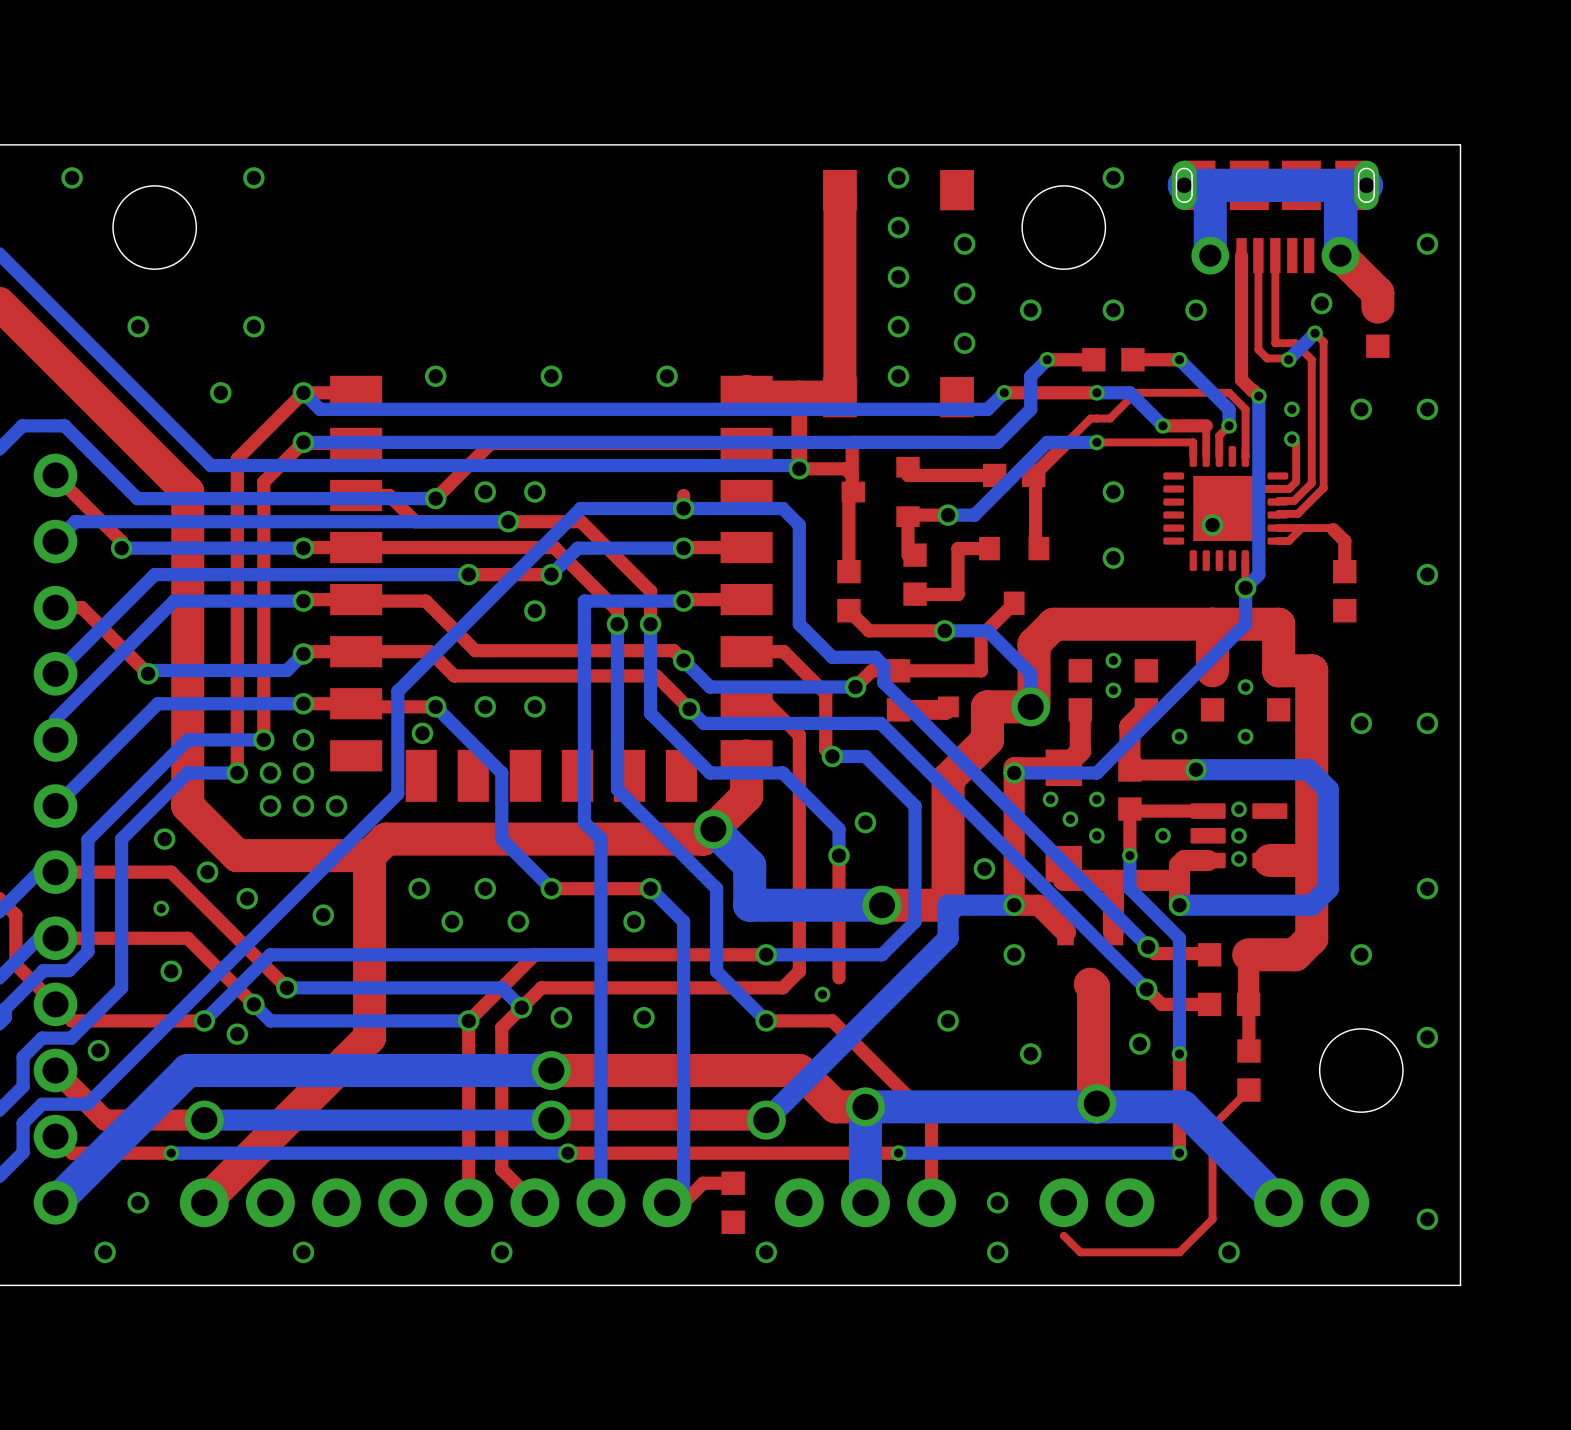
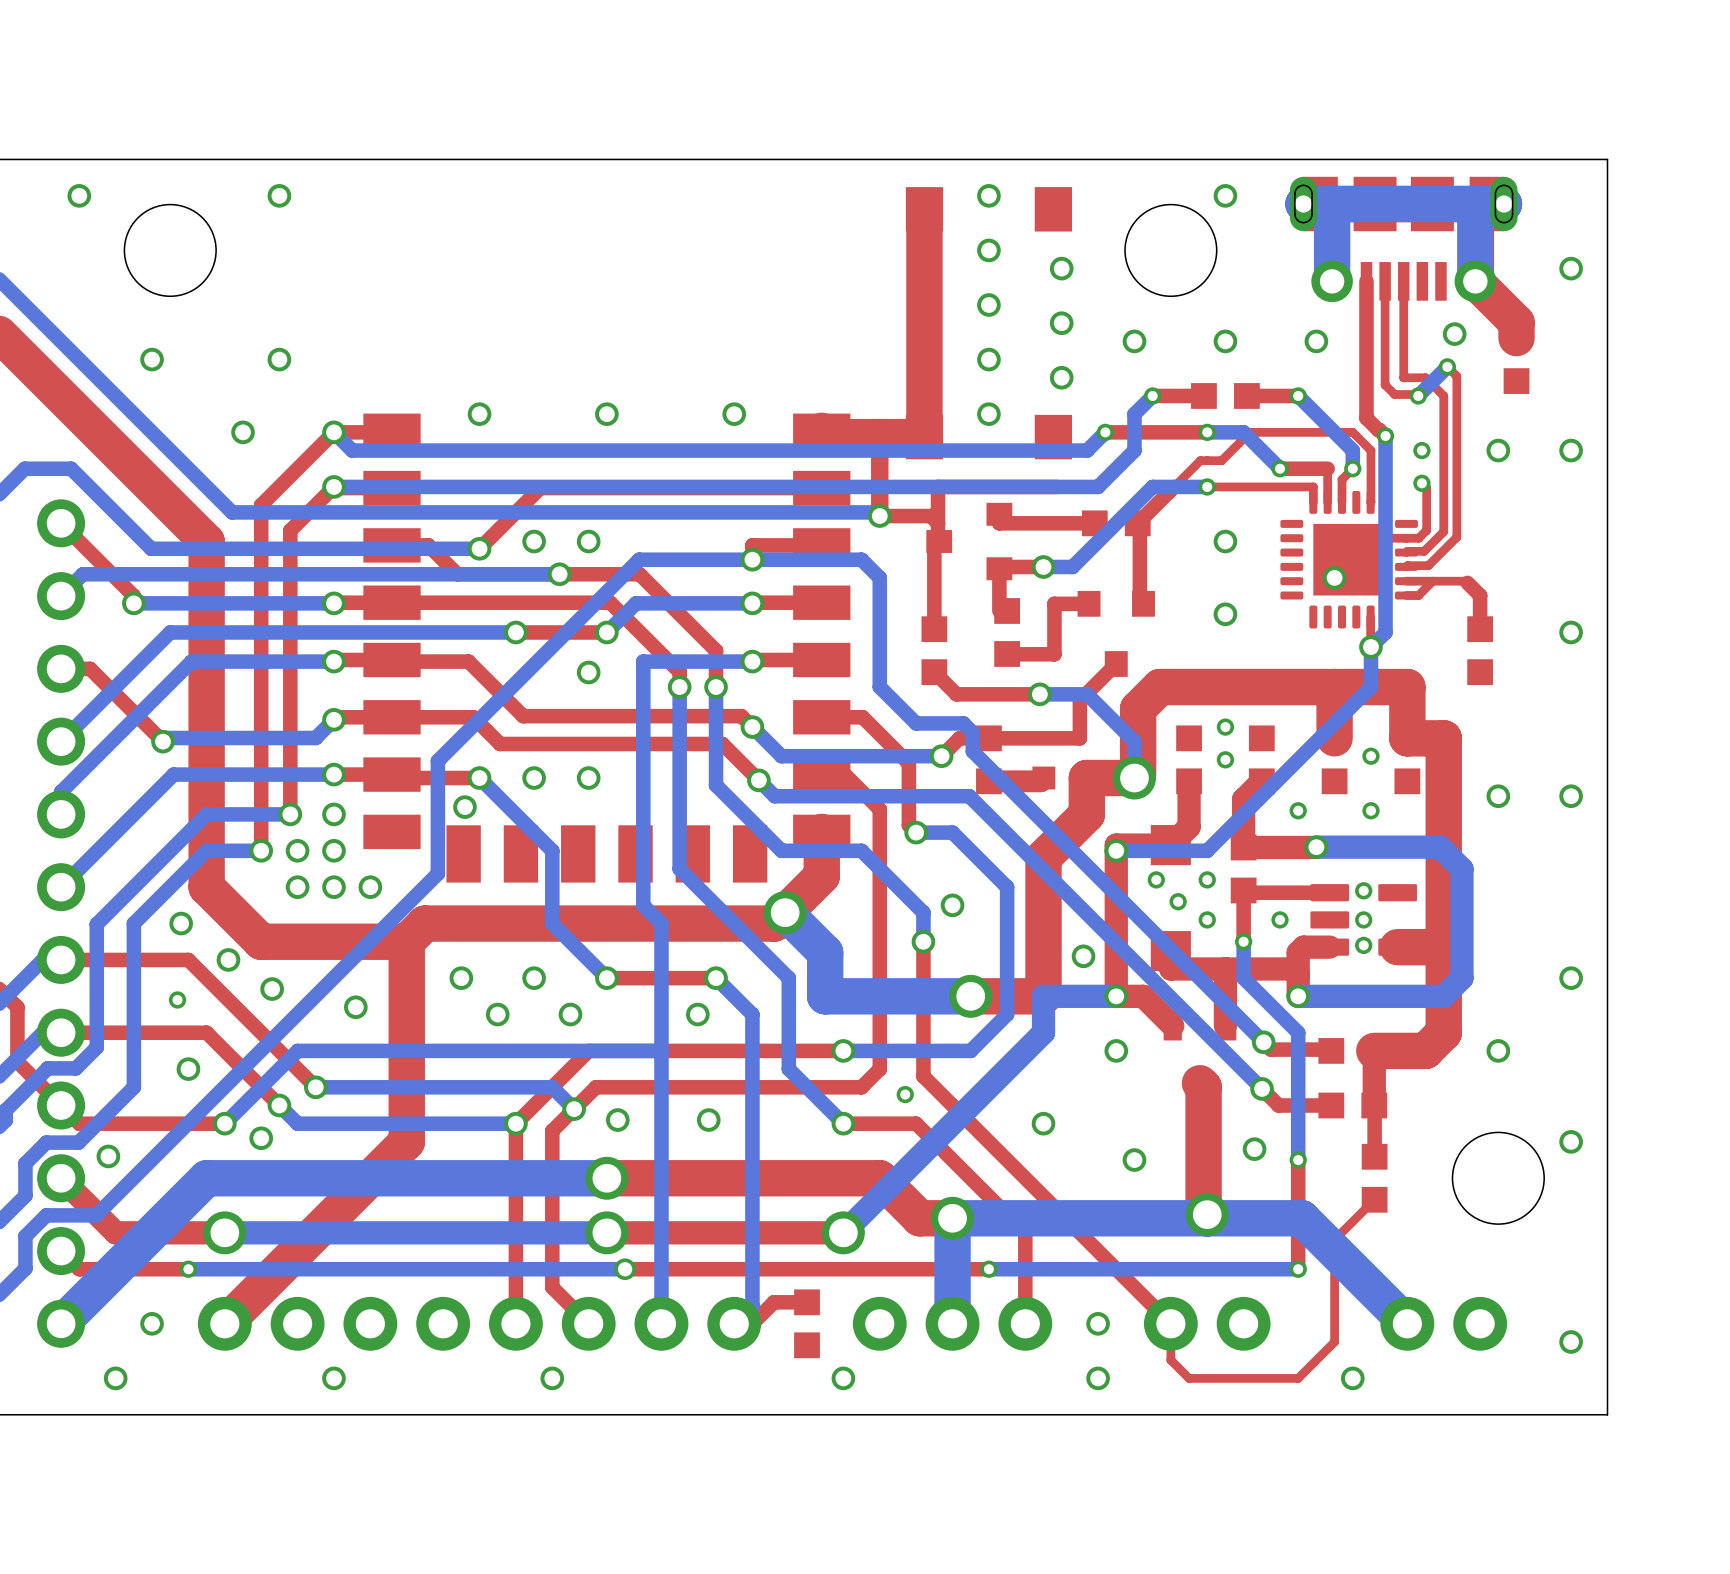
top track: none -> (821, 545) (752, 545)
top track: none -> (923, 1076) (1170, 1323) (1170, 1360)

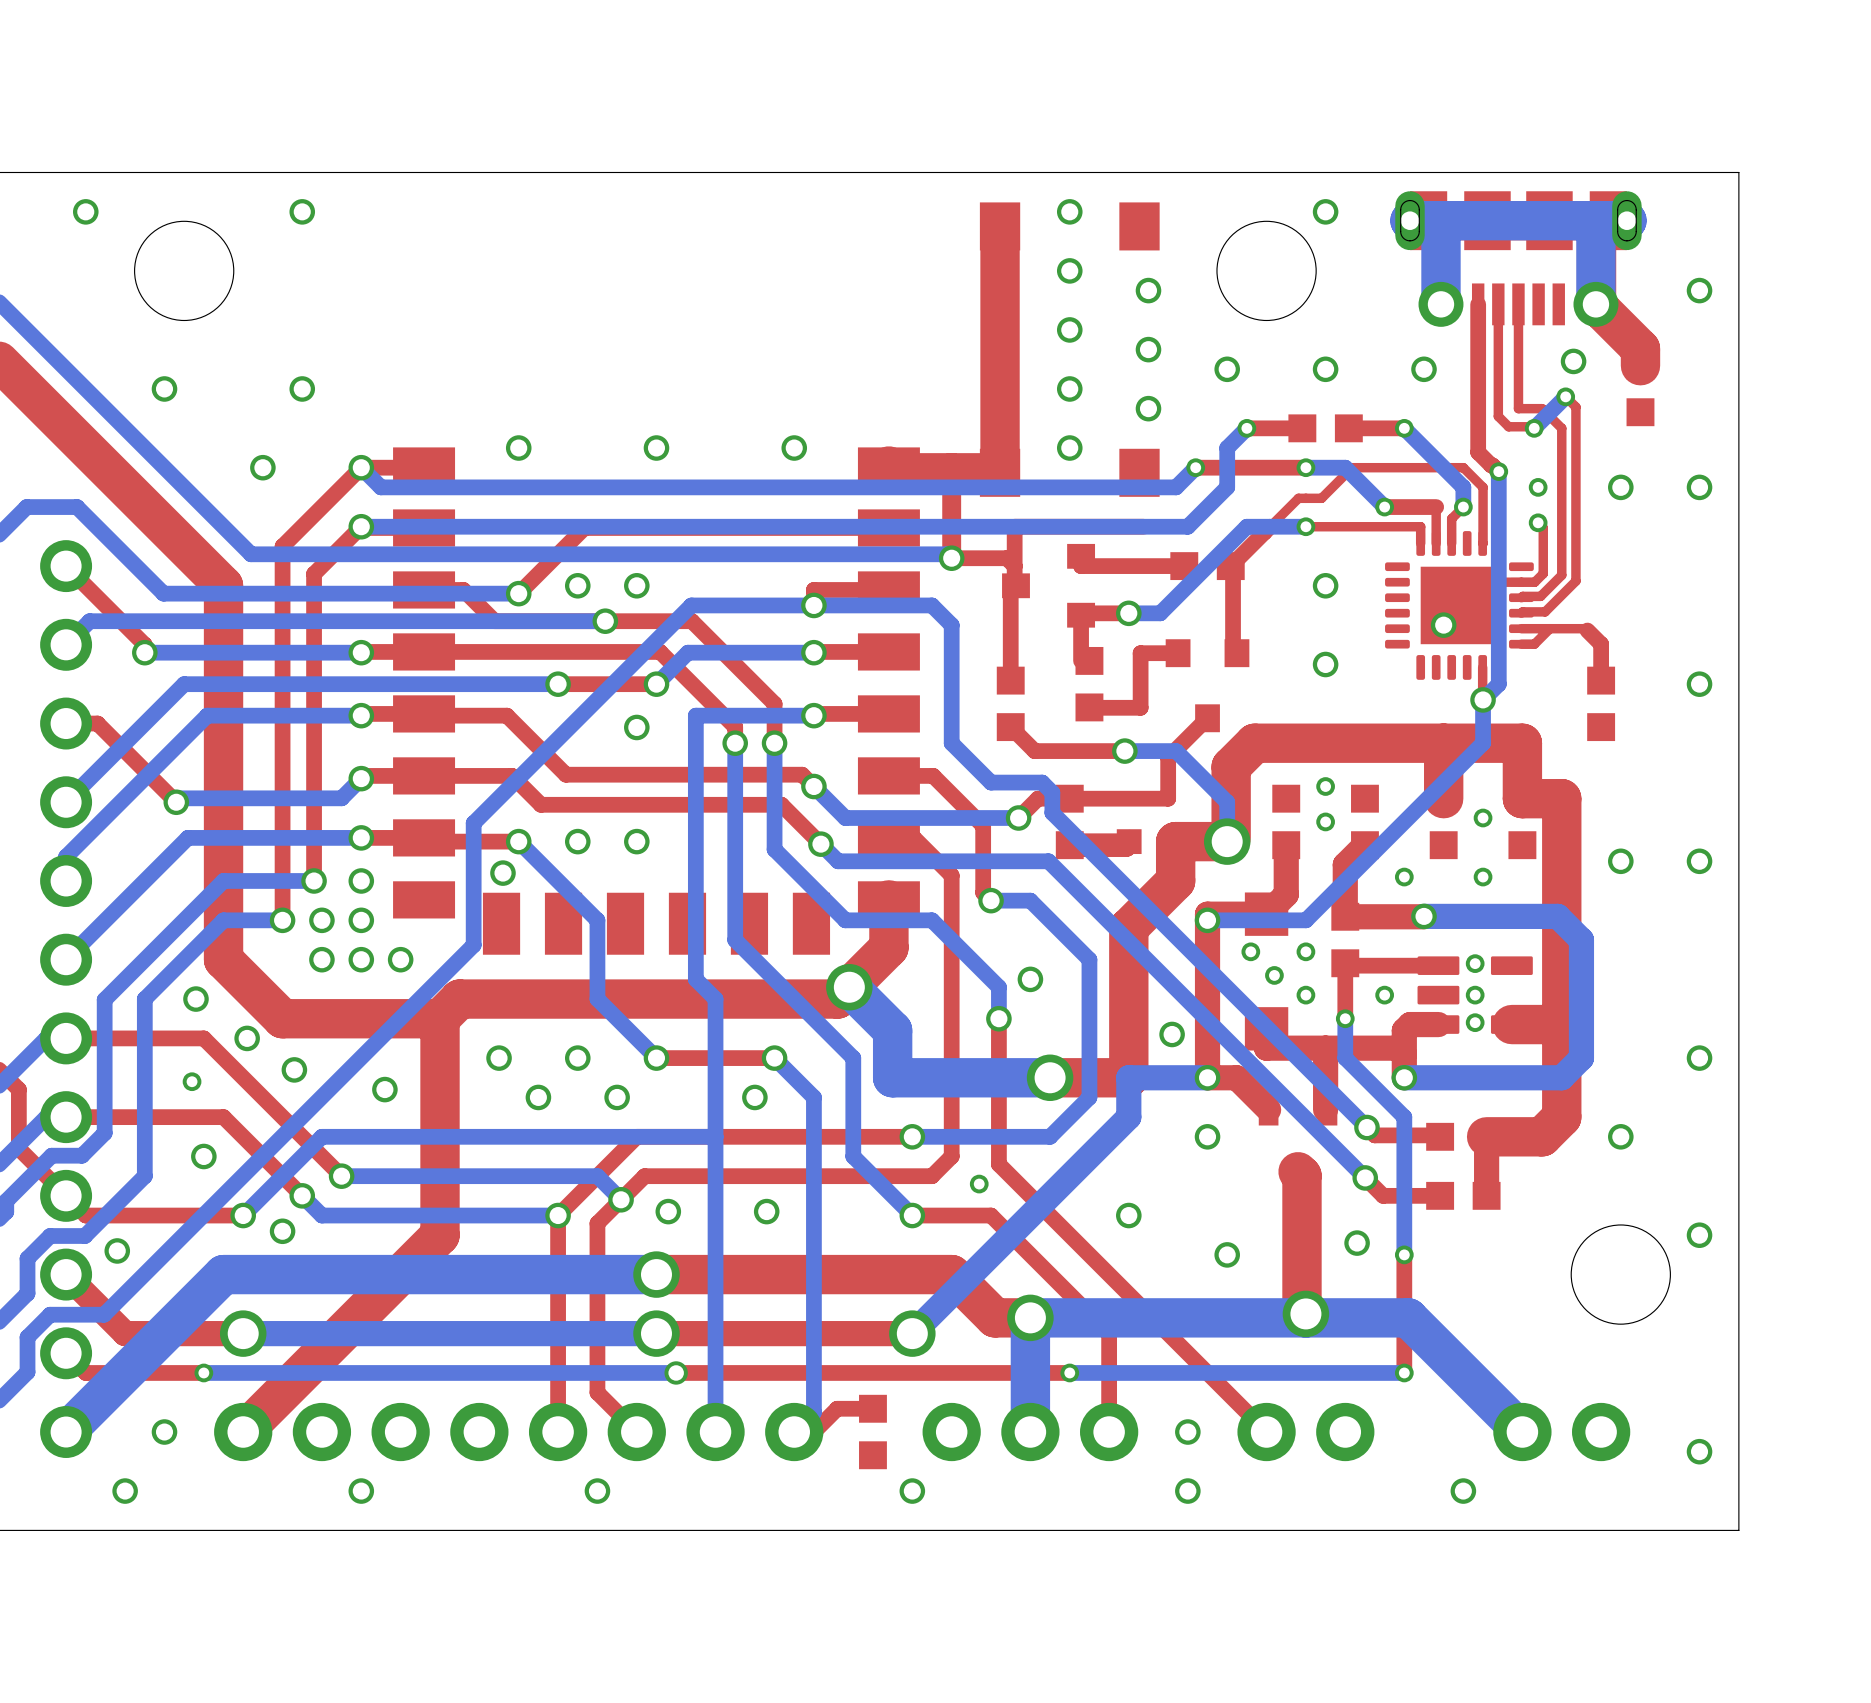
top track: (1374, 1105) (1374, 1156) -> none
part: (1374, 1178) -> none
top track: (1374, 1199) (1334, 1239) (1334, 1342) (1298, 1378) (1189, 1378) (1170, 1360) (1170, 1323) -> none

